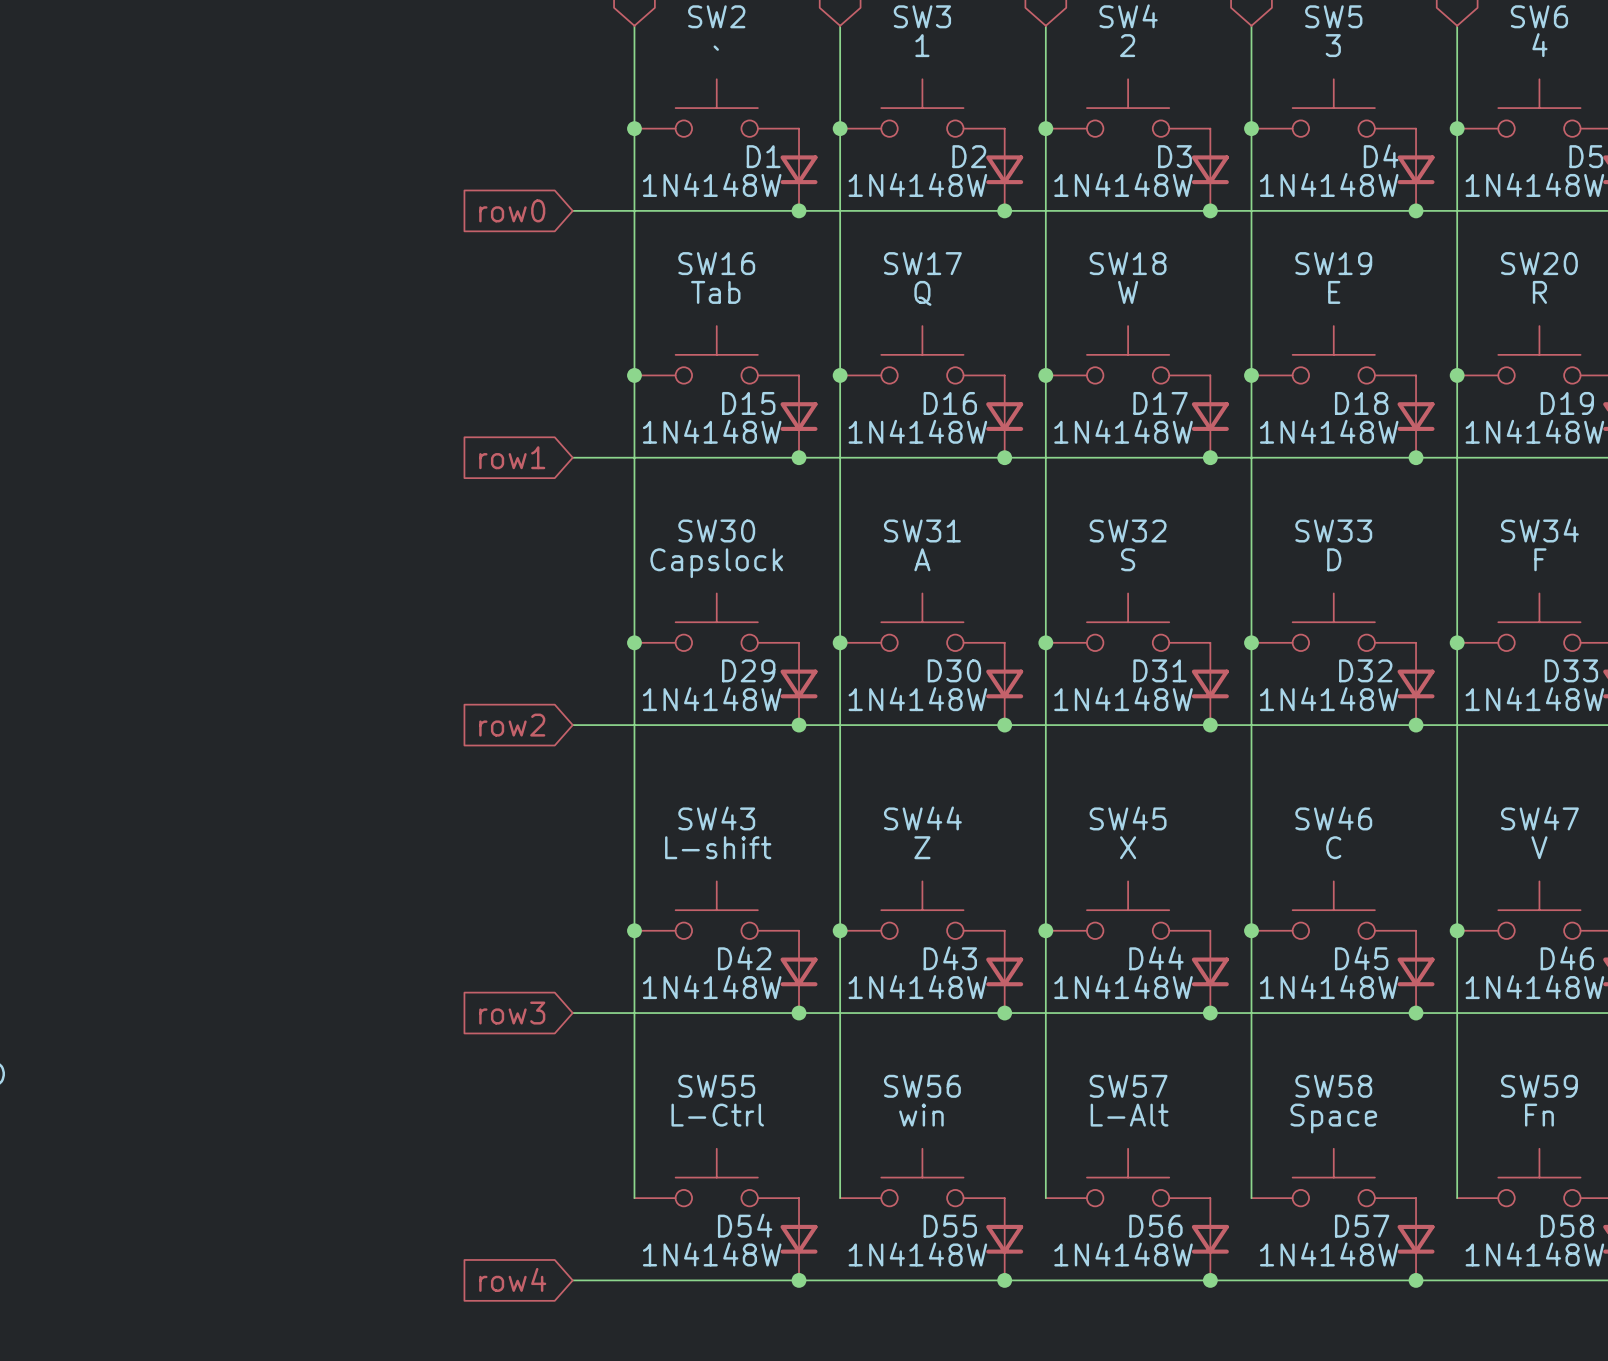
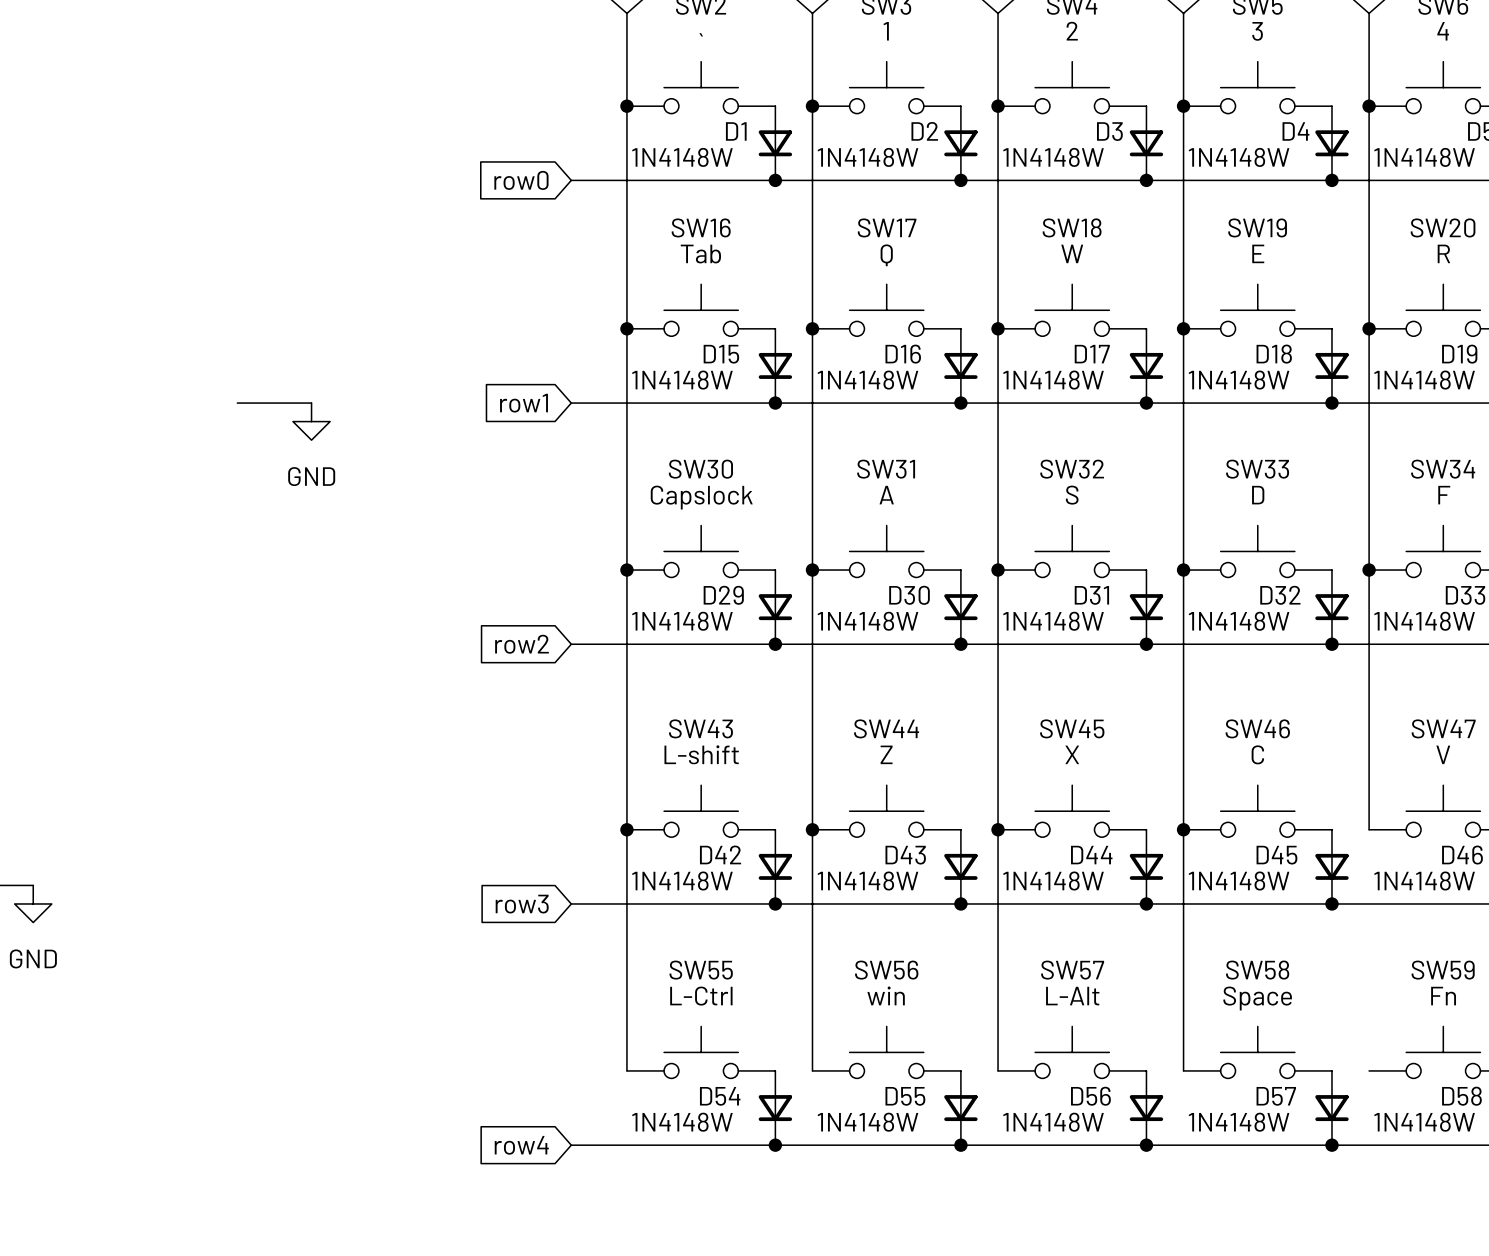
wire: none -> (237, 403) (311, 403)
power symbol: none -> GND (311, 421)
wire: (1457, 930) (1457, 1198) -> none
junction: (1457, 930) -> none

